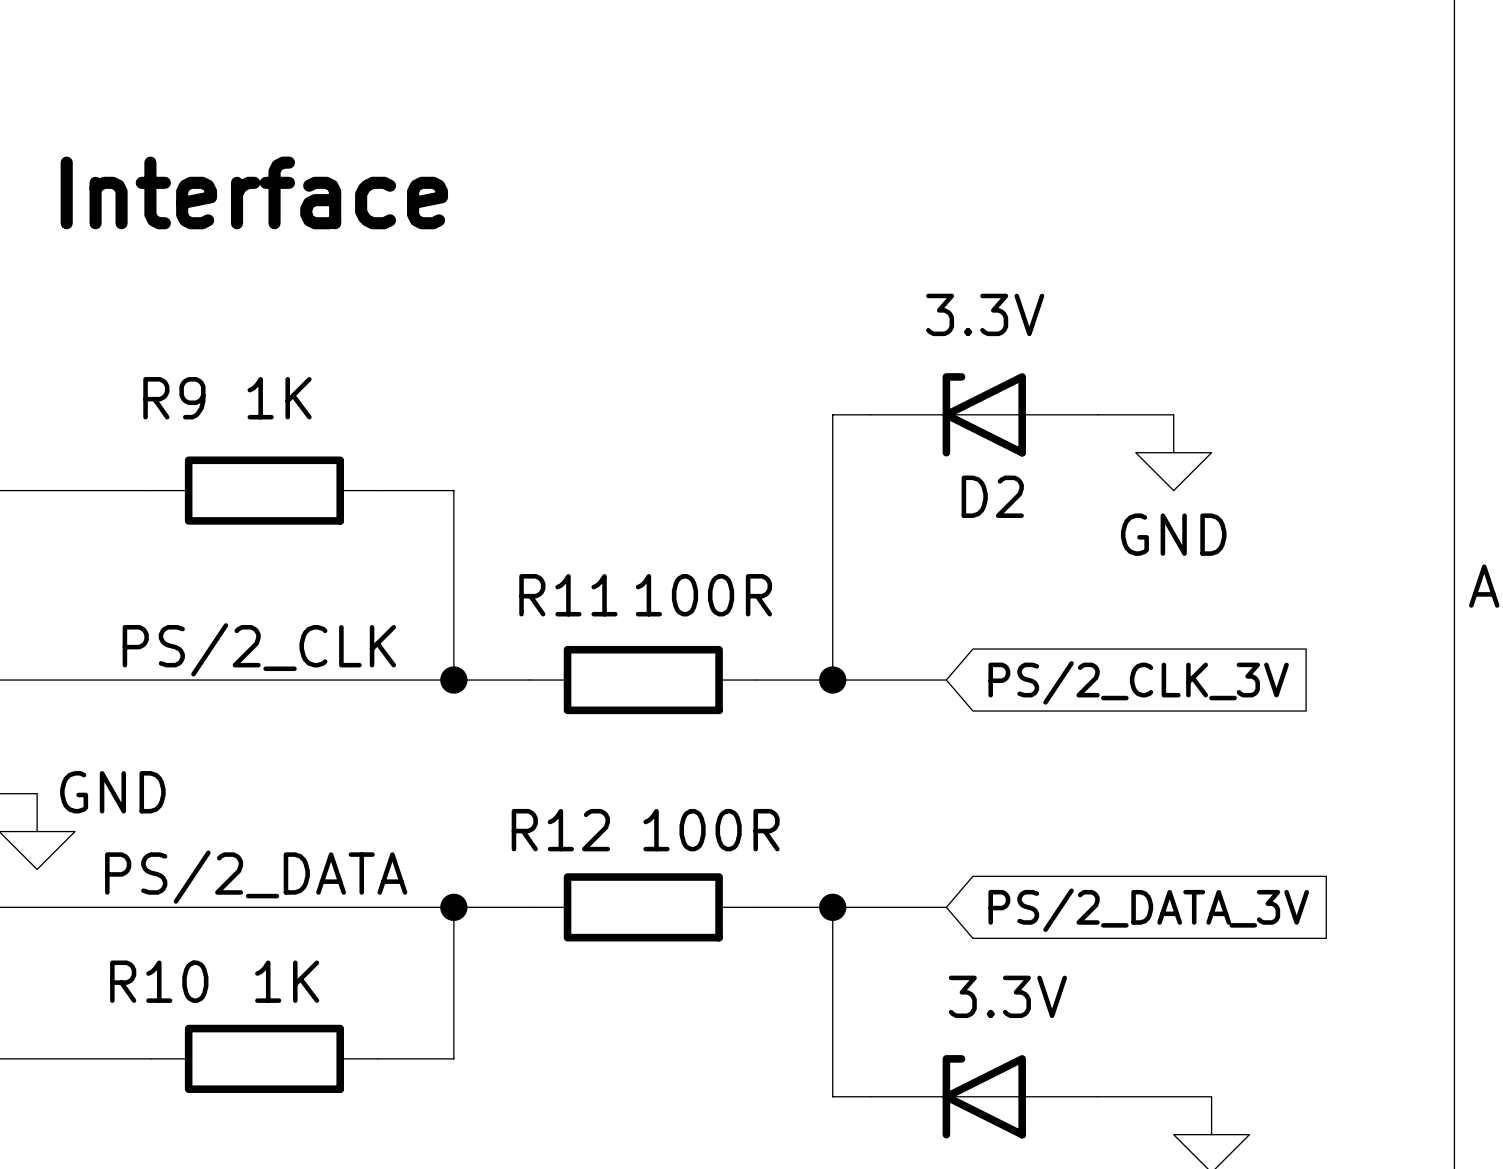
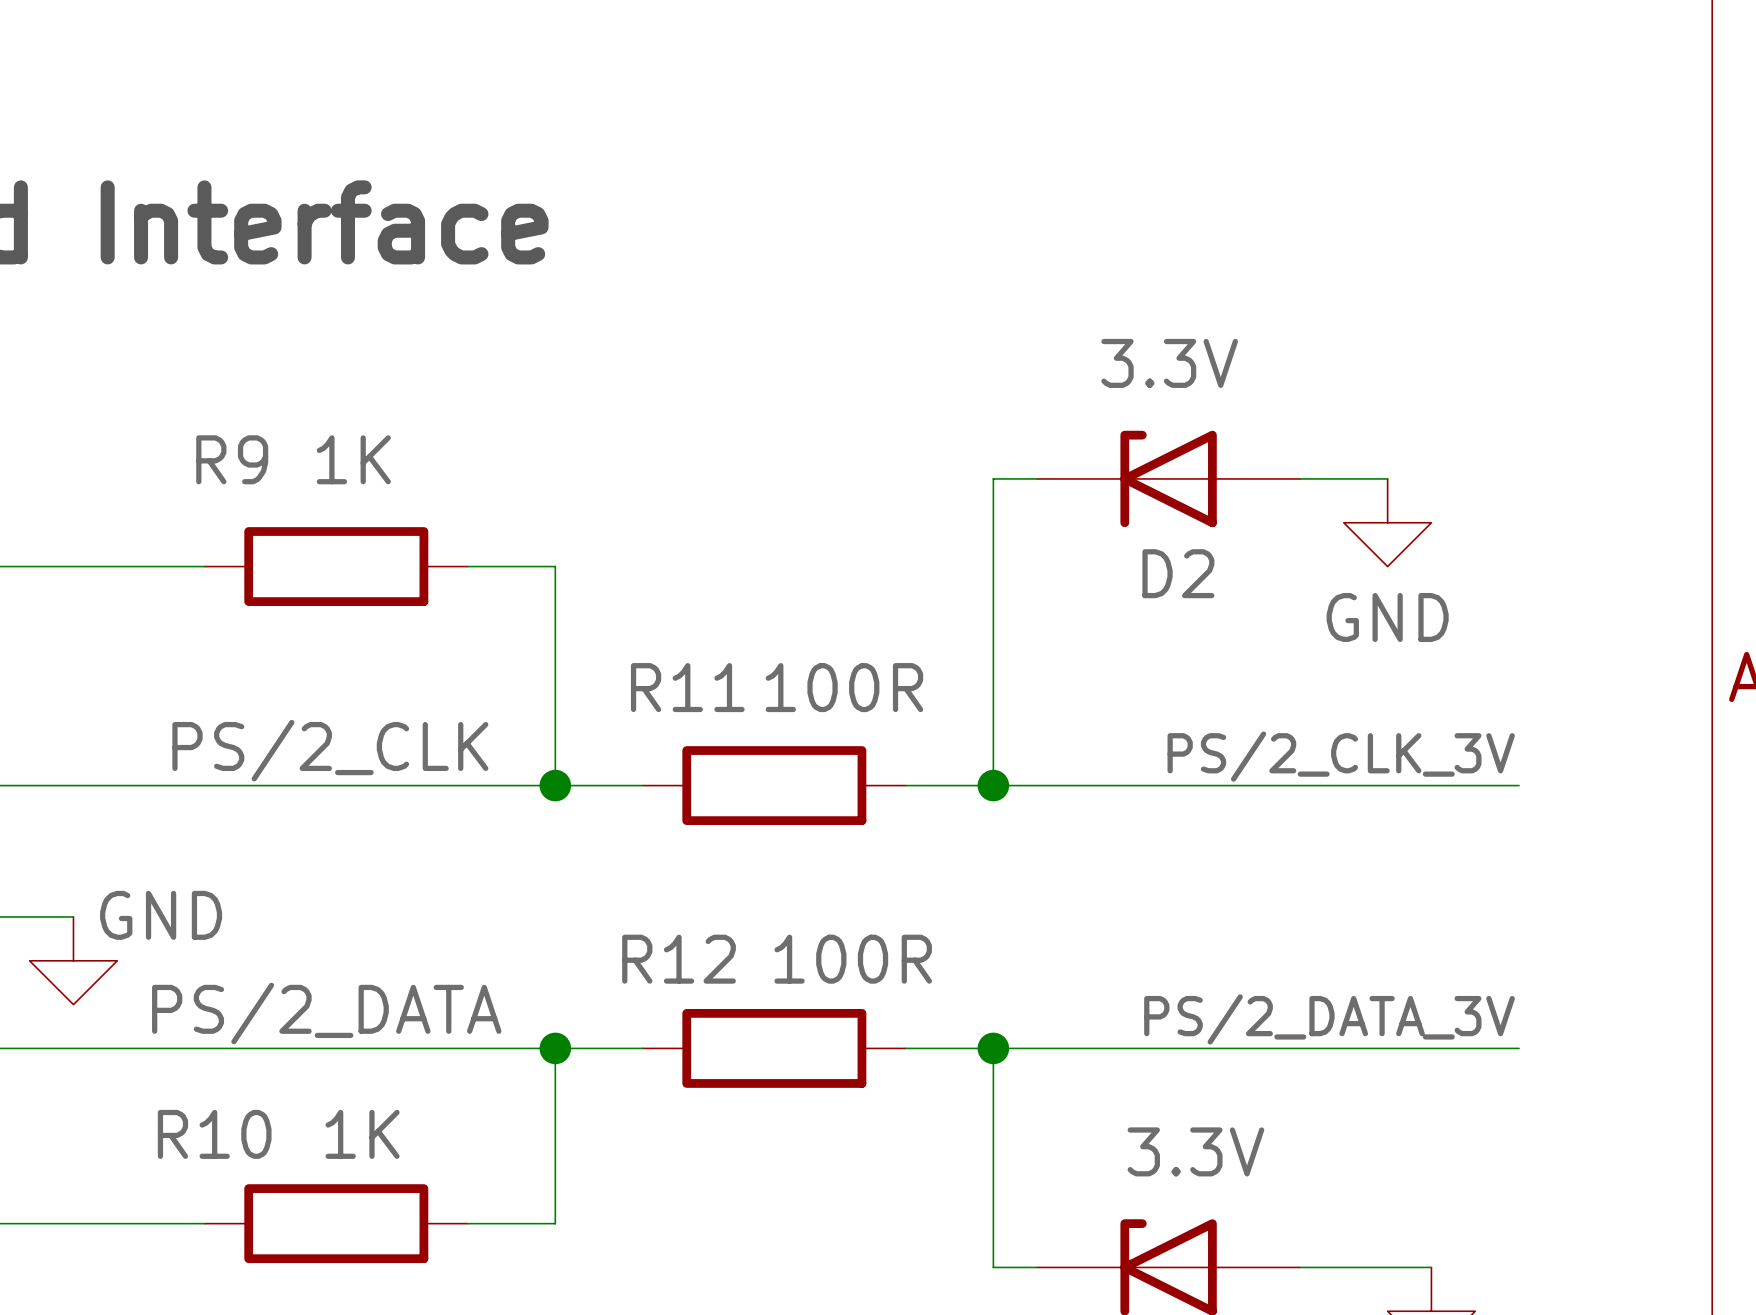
label: none -> PS/2_CLK_3V (1341, 756)
wire: none -> (1124, 785) (1519, 785)
global label: PS/2_CLK_3V (1138, 682) -> none
label: none -> PS/2_DATA_3V (1329, 1019)
wire: none -> (1124, 1048) (1519, 1048)
global label: PS/2_DATA_3V (1148, 910) -> none

